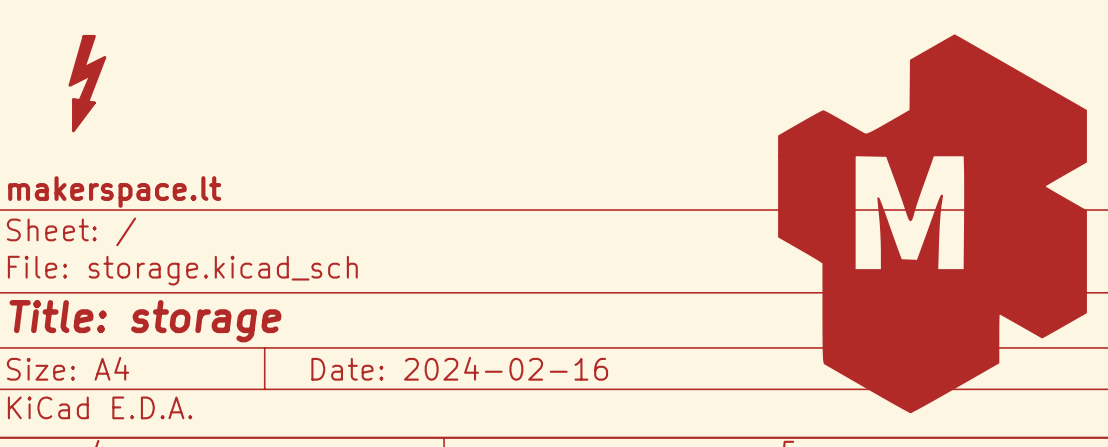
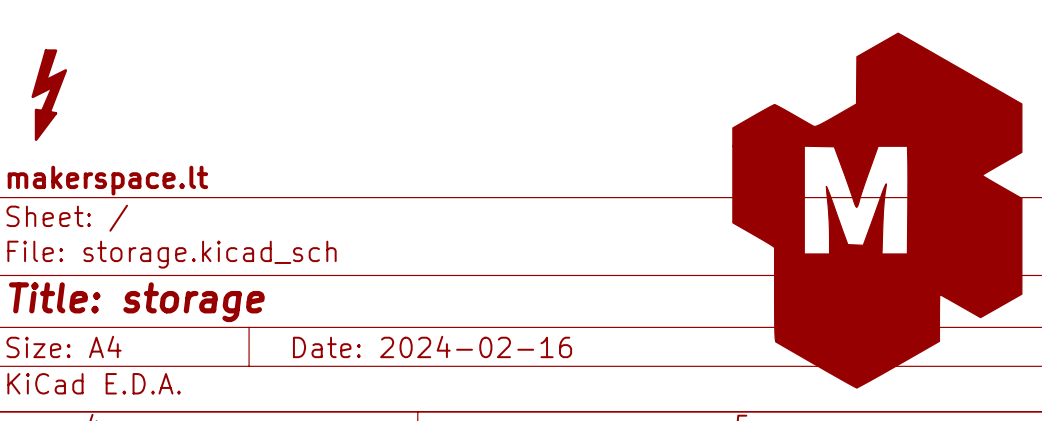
part position: (87, 83) -> (49, 95)

